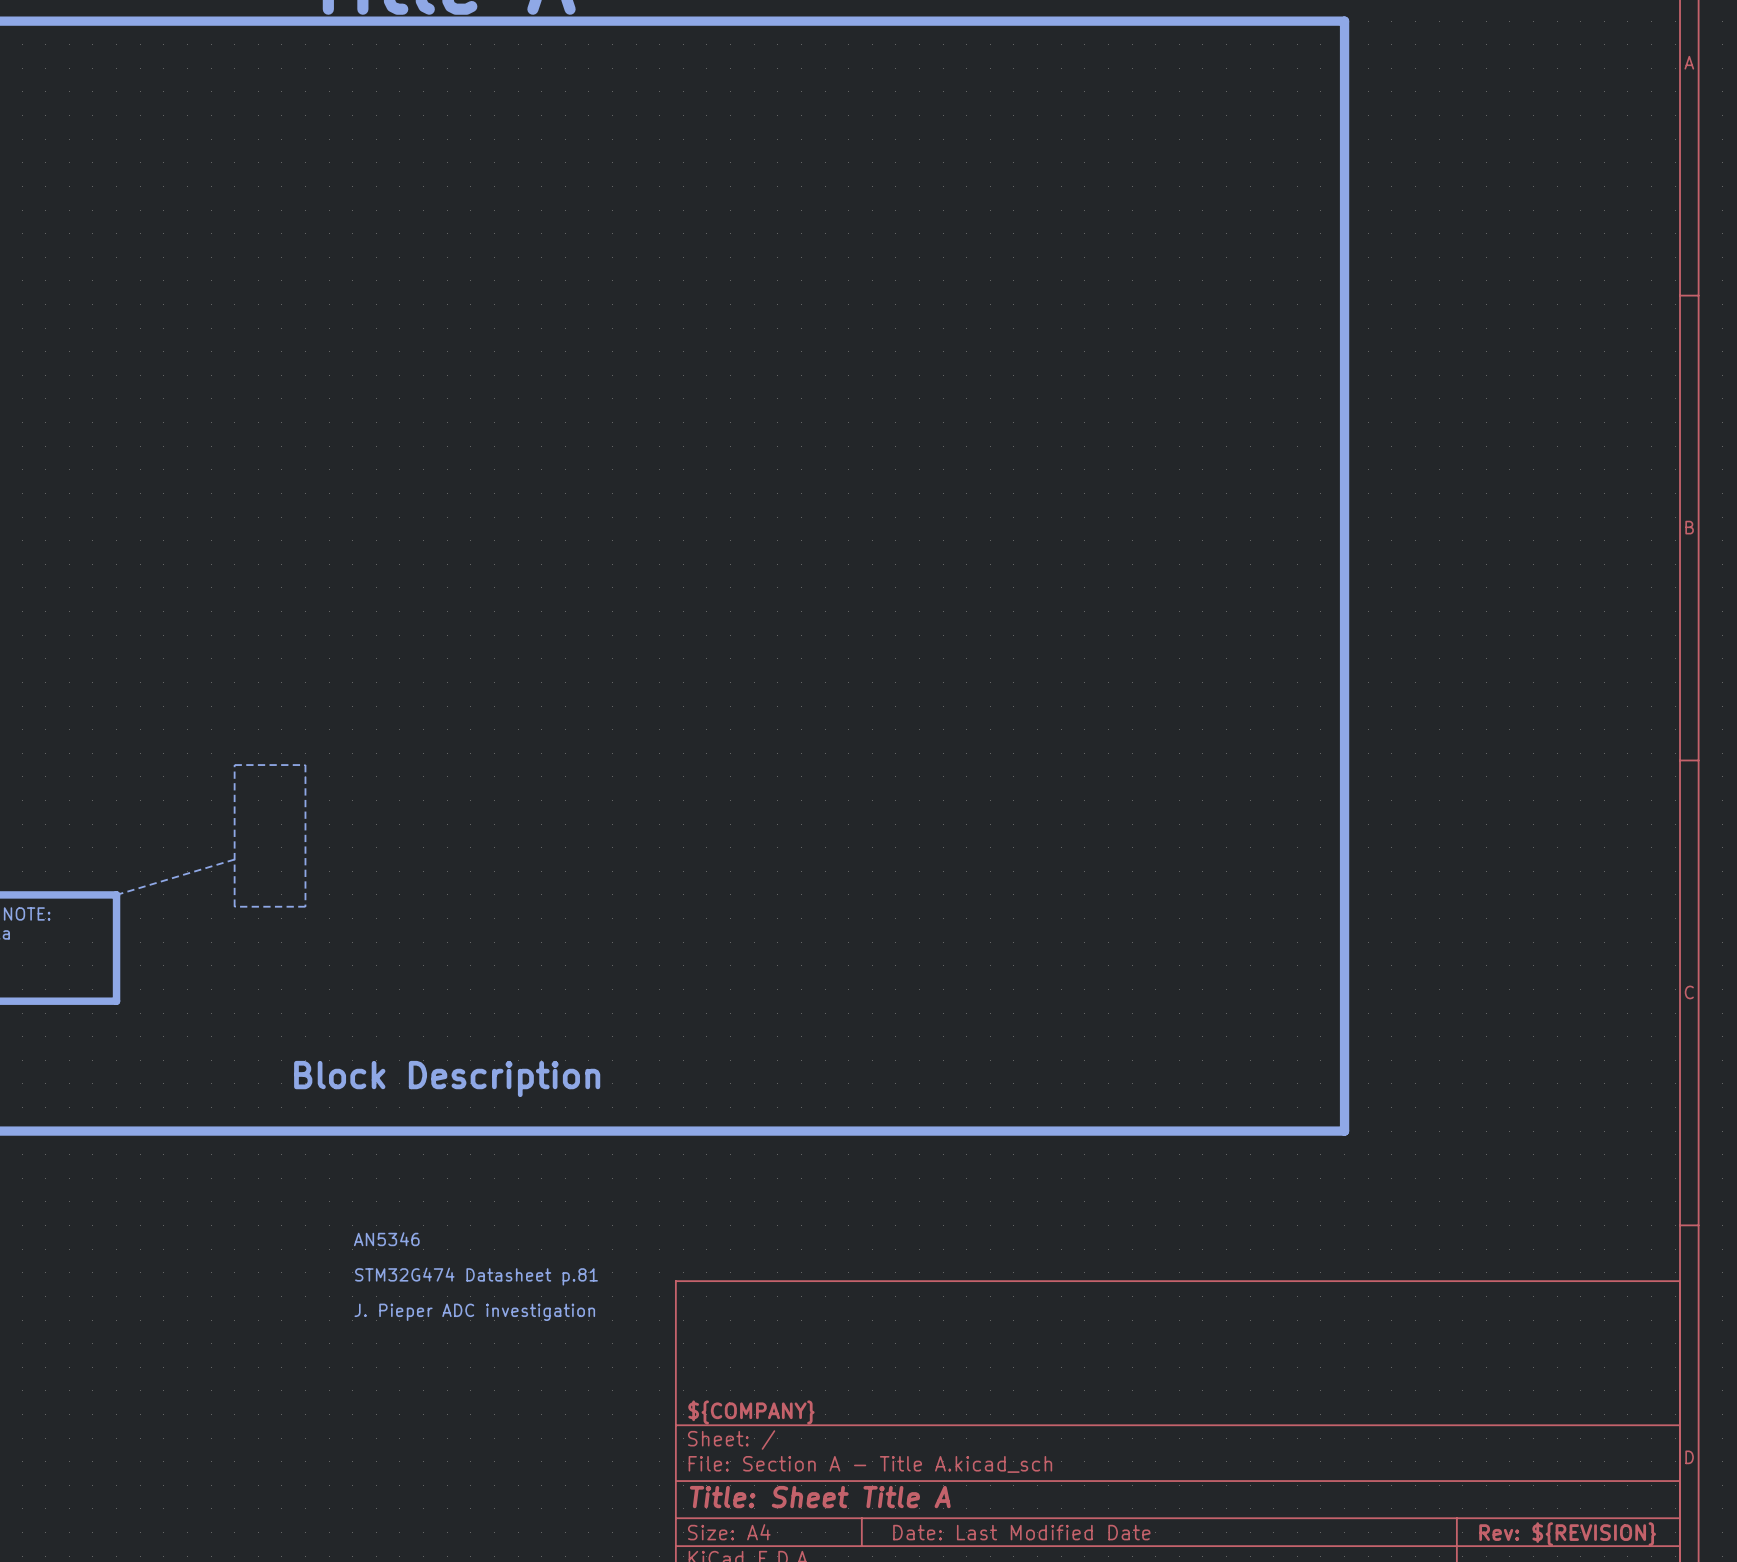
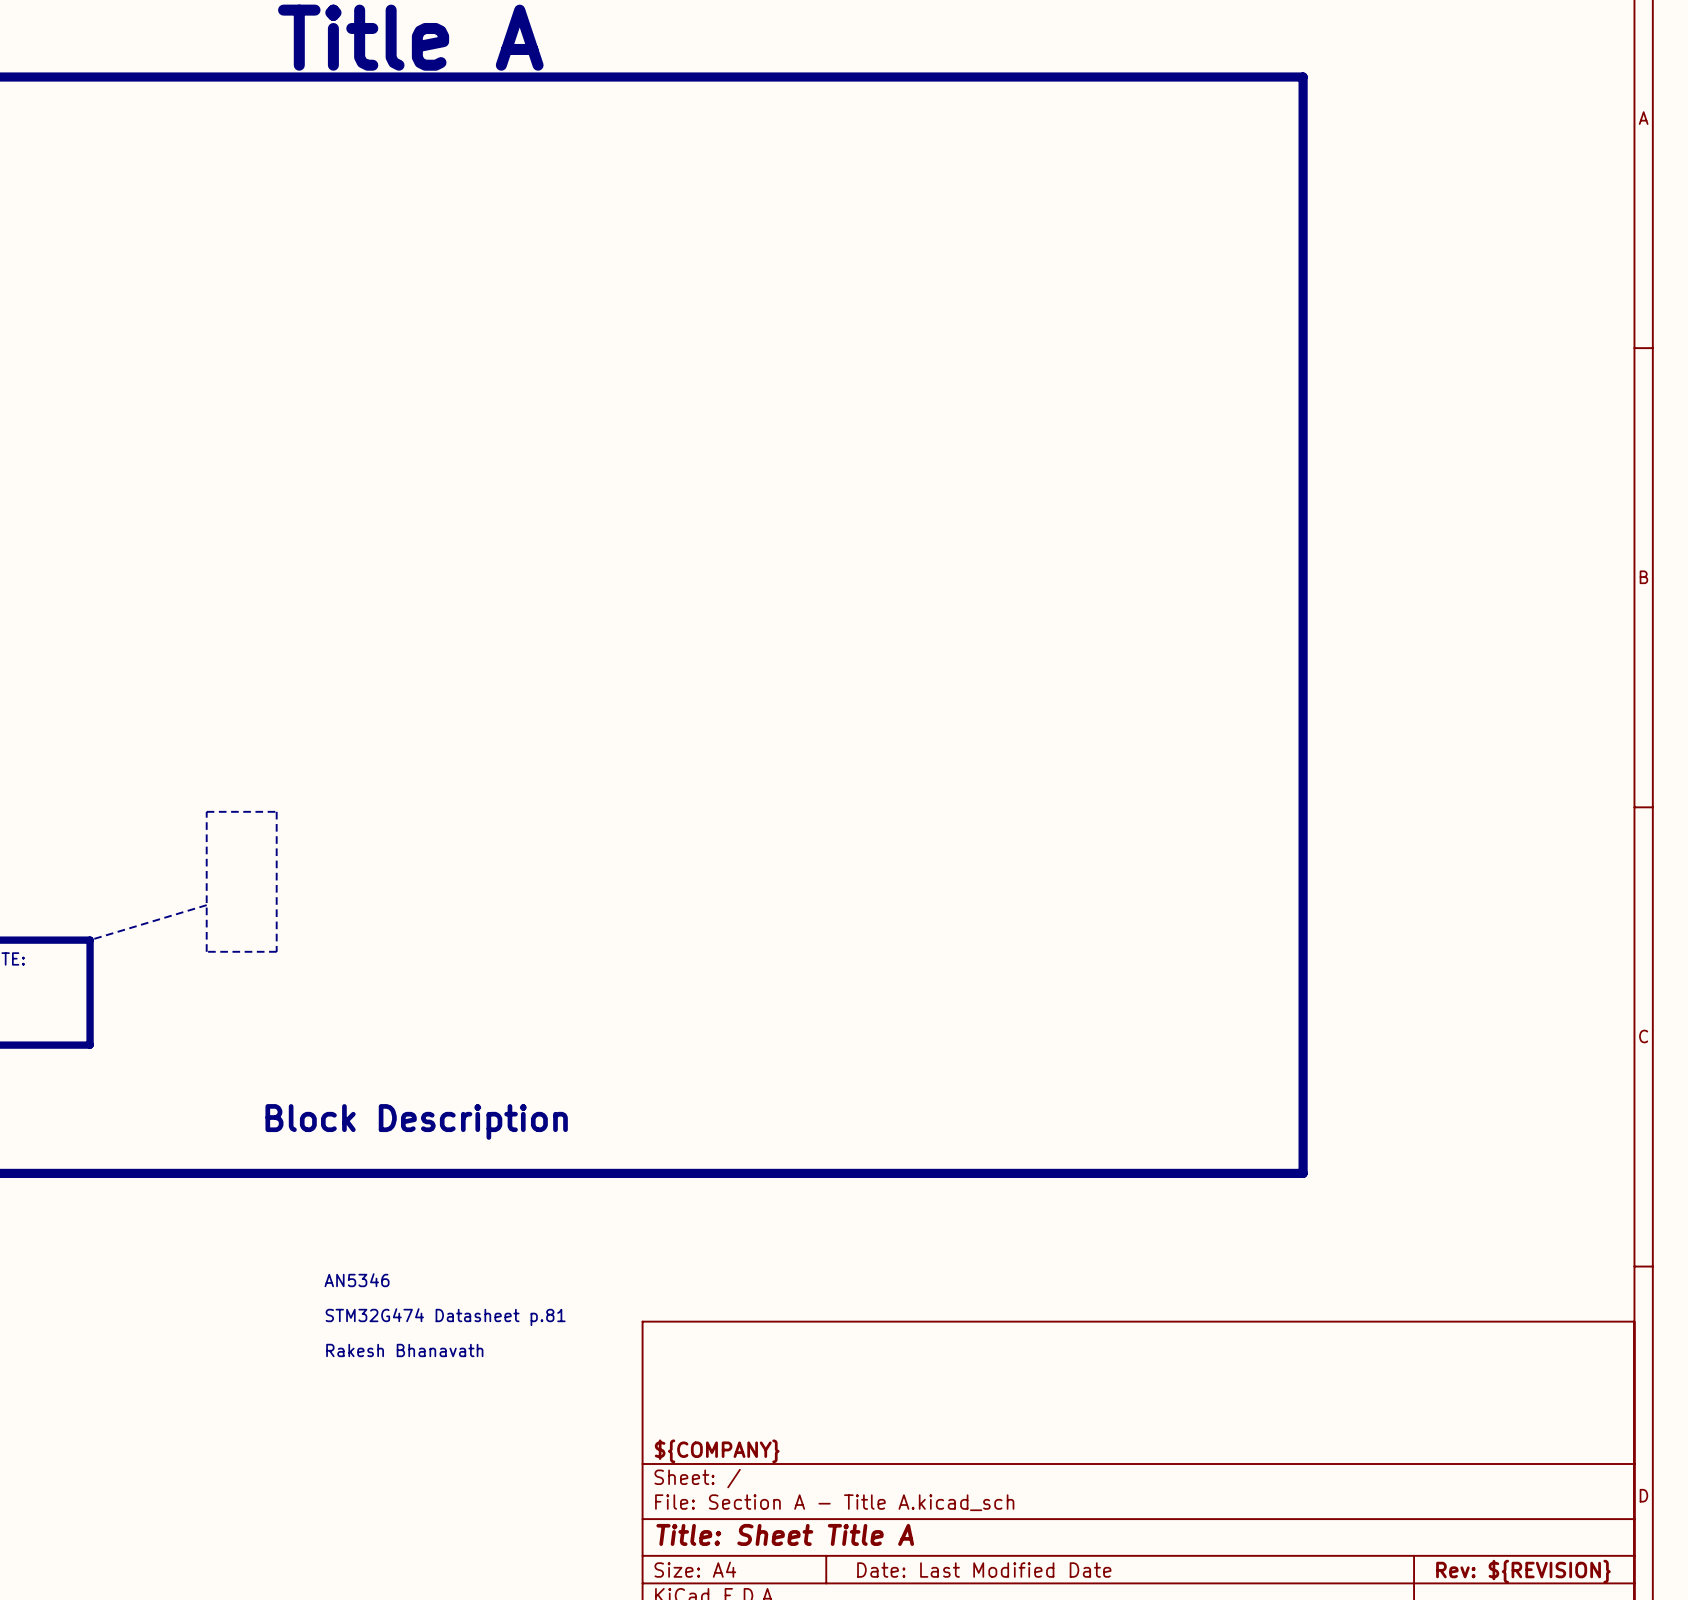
text: J. Pieper ADC investigation (474, 1312) -> Rakesh Bhanavath (404, 1350)

